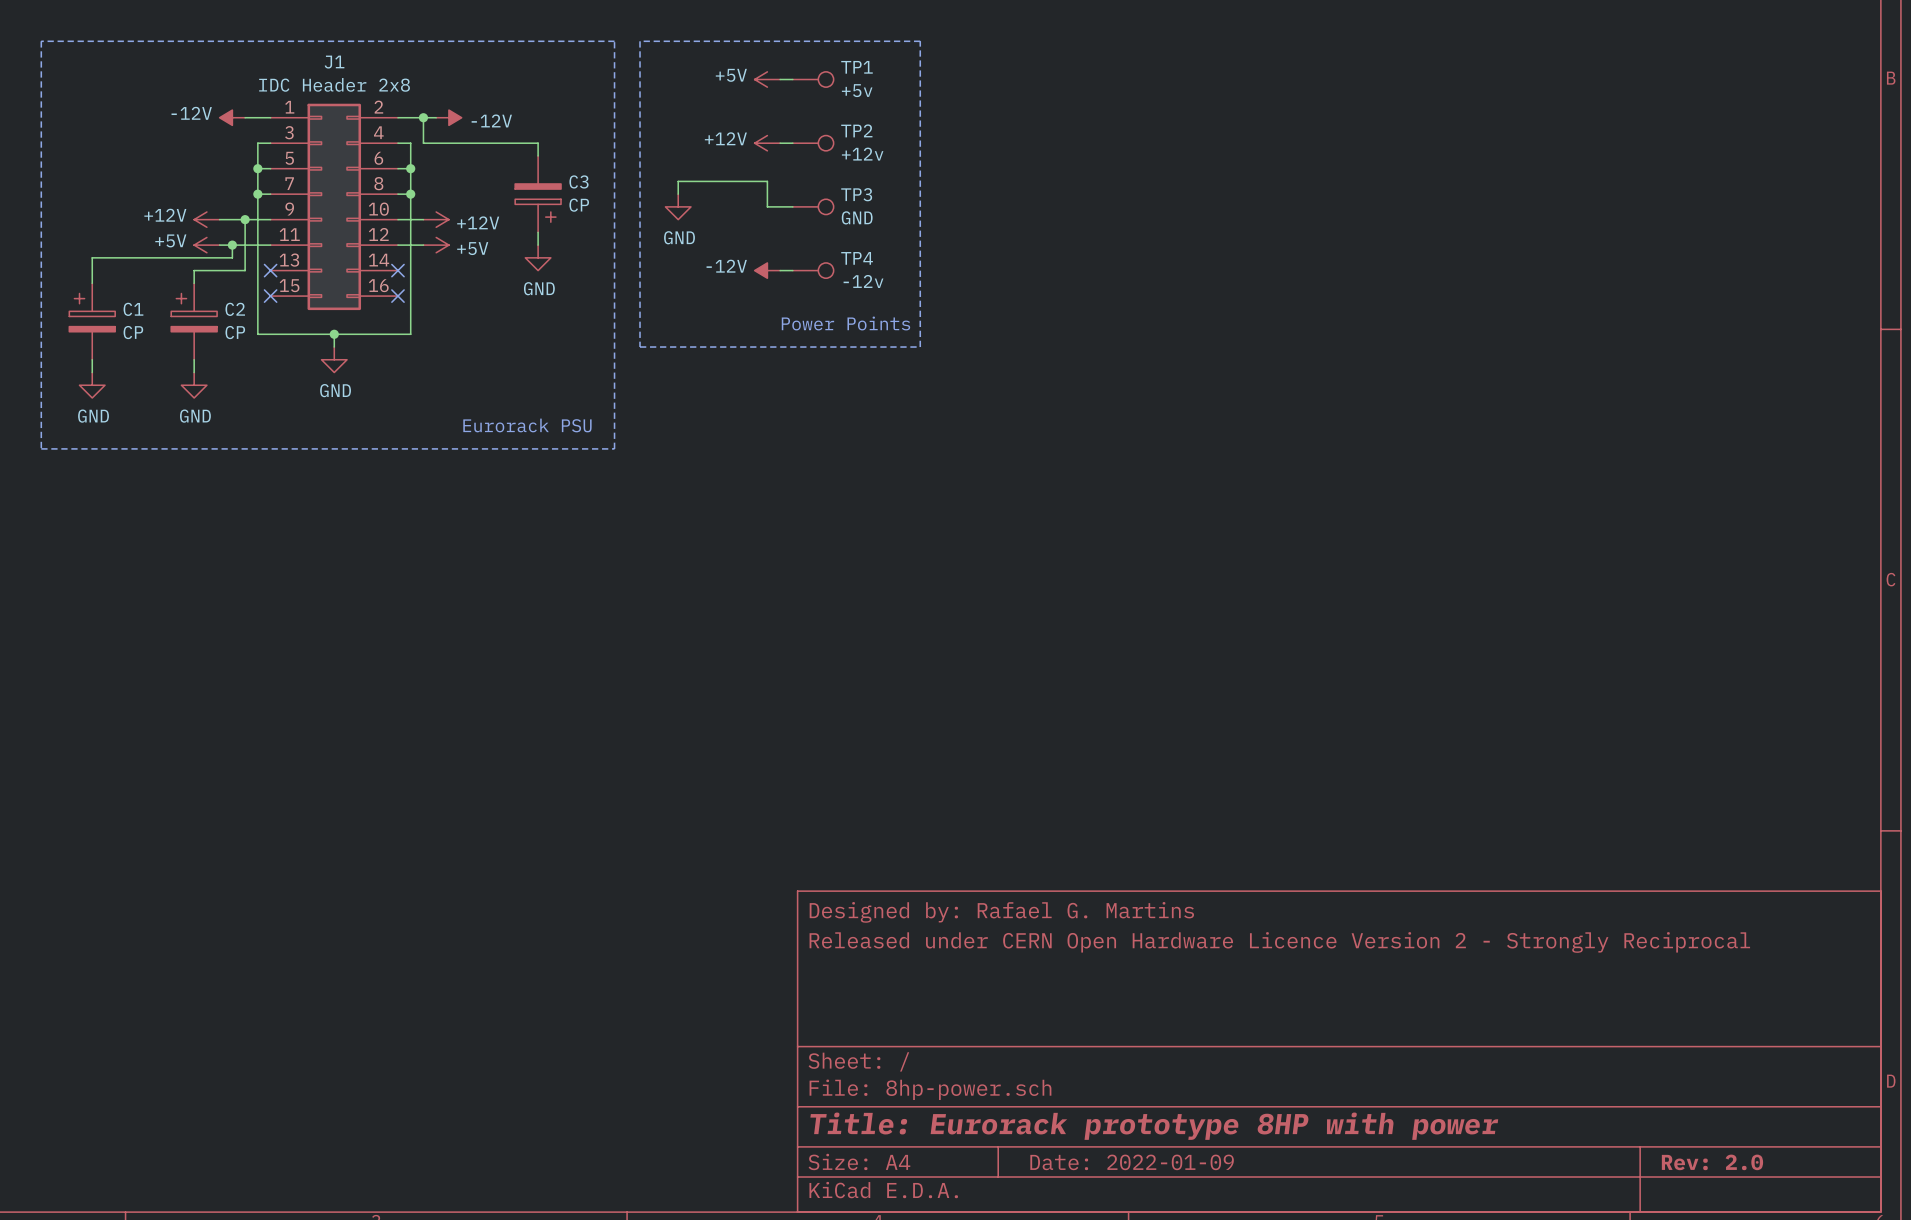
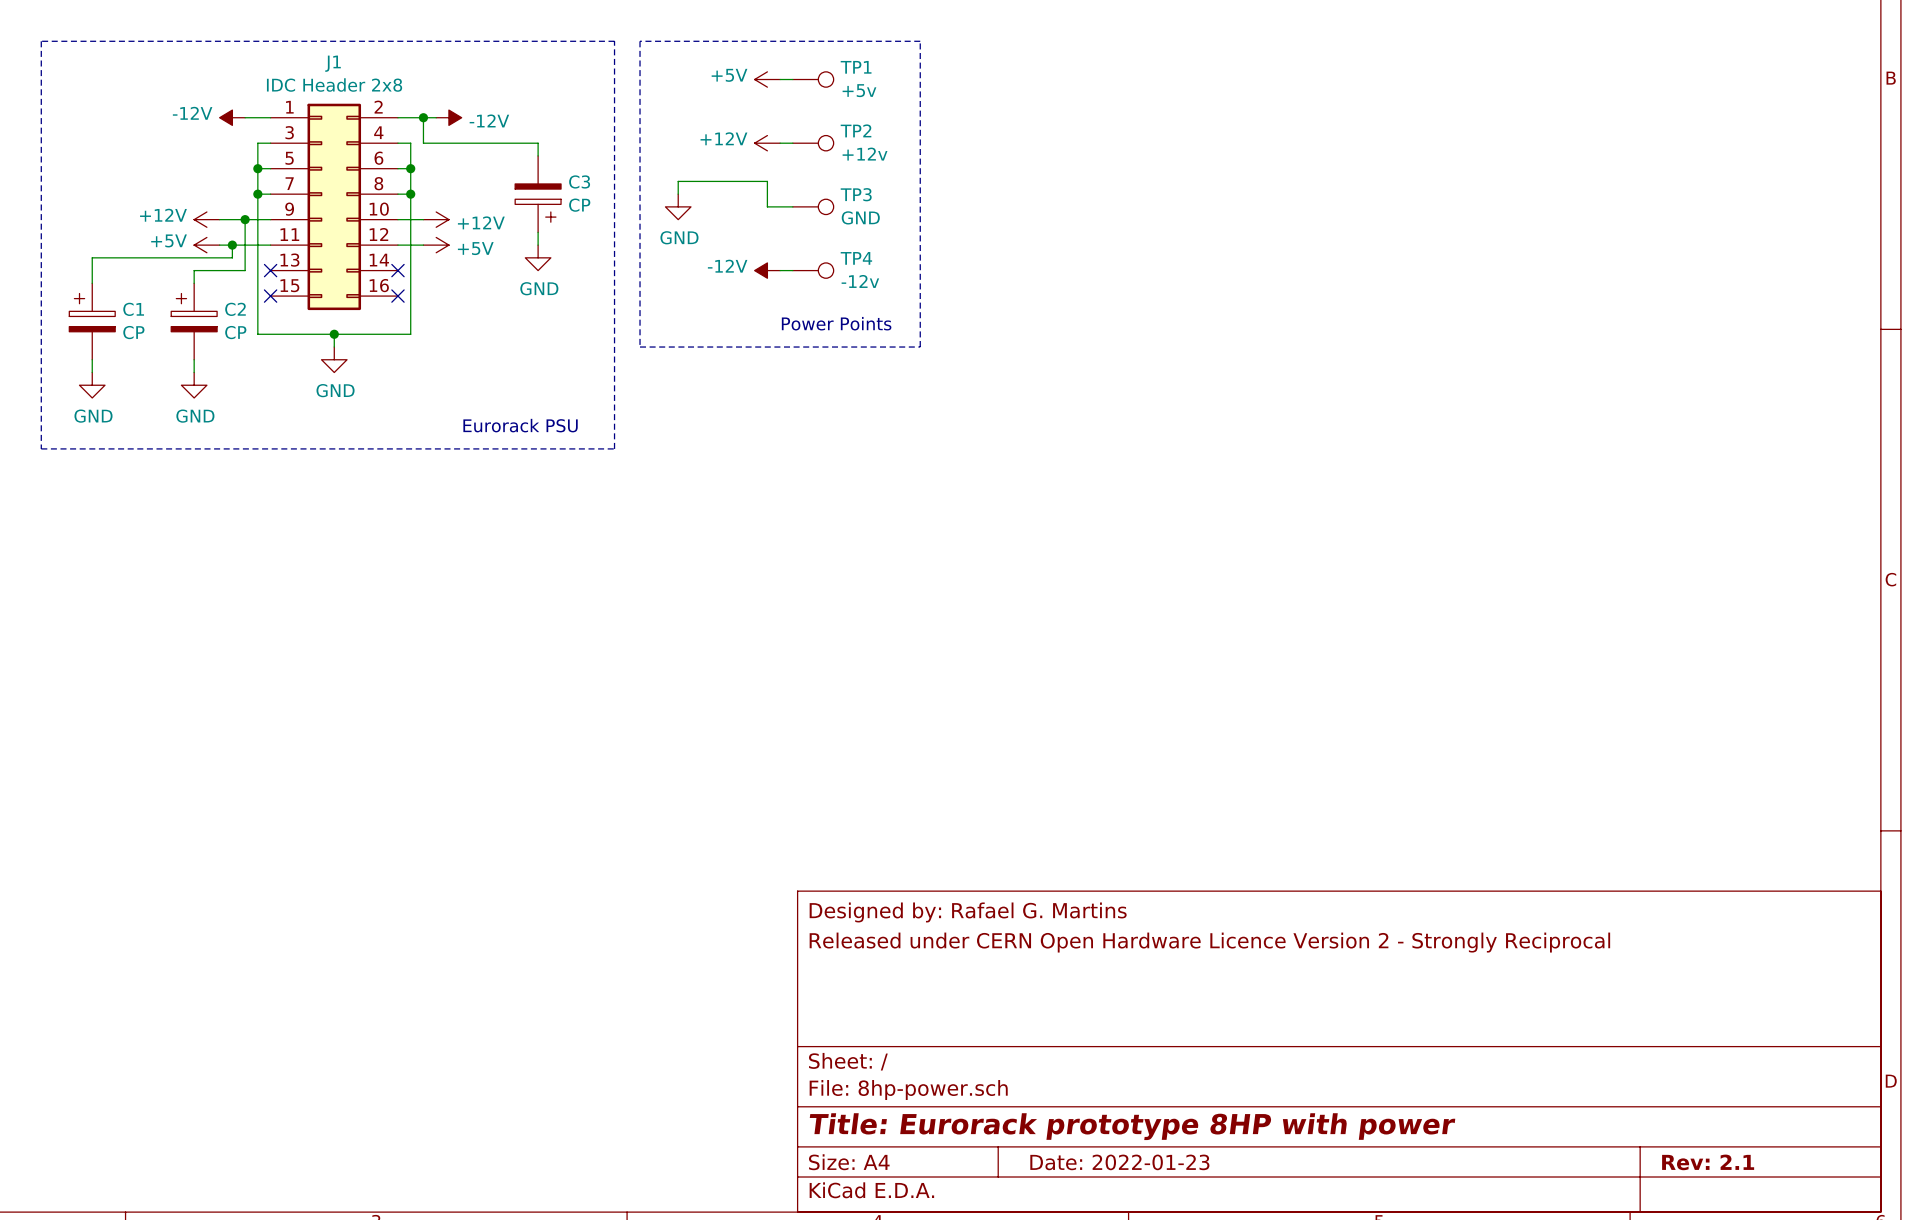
title block: Date: 2022-01-09 (1132, 1162) -> Date: 2022-01-23 (1119, 1162)
title block: Rev: 2.0 (1712, 1162) -> Rev: 2.1 (1708, 1162)

